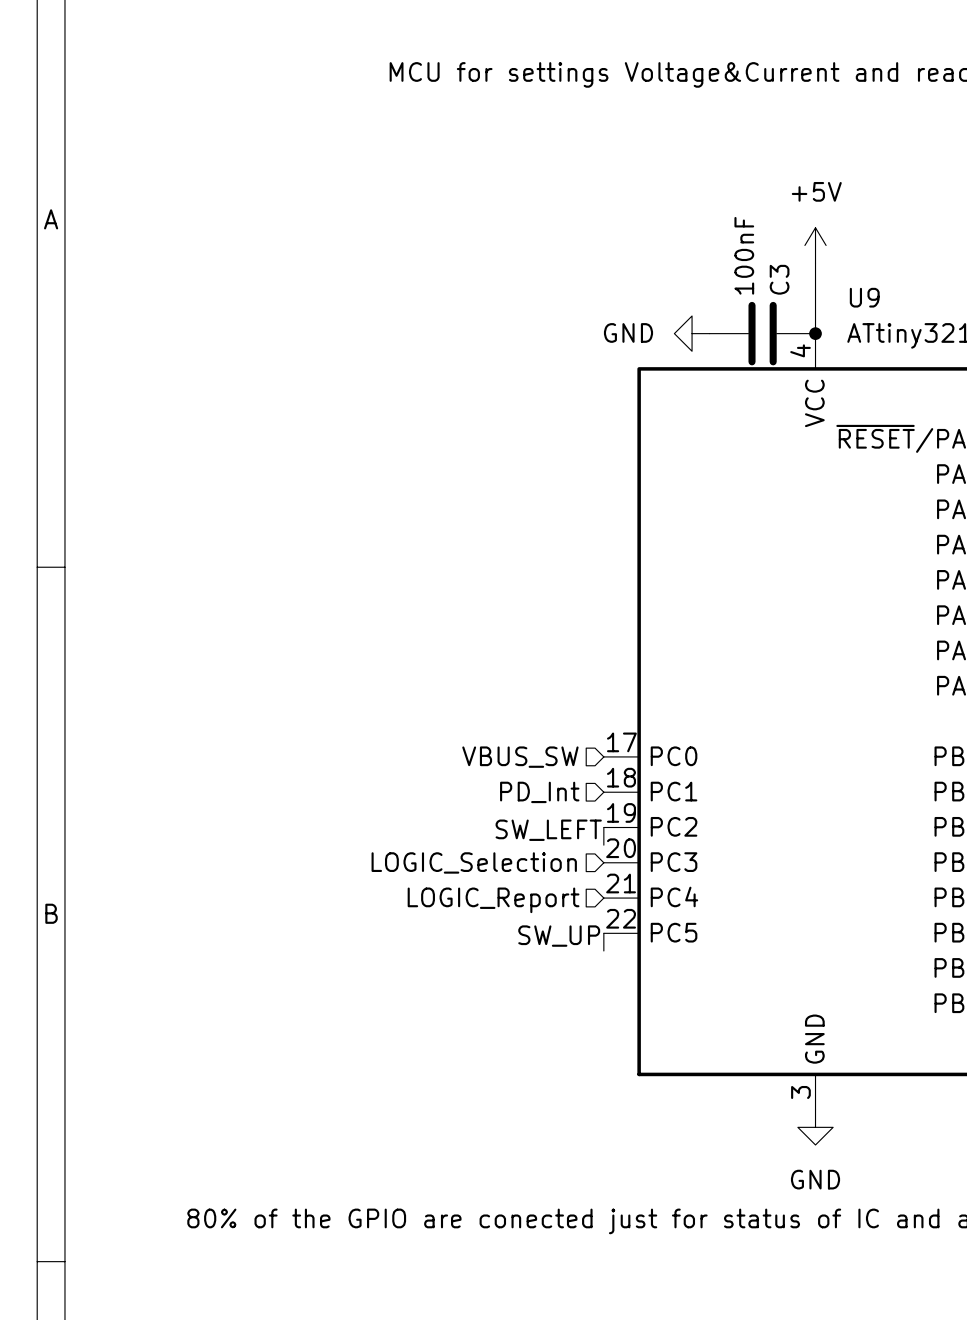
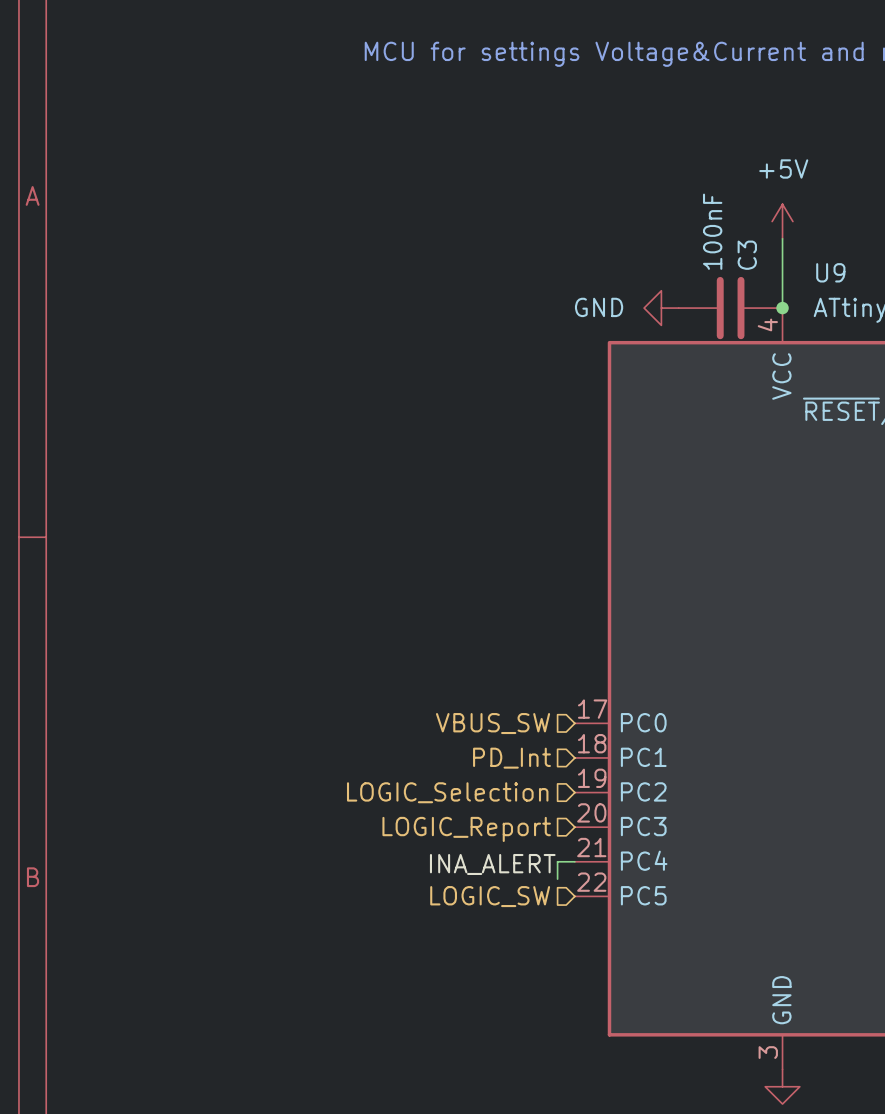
hierarchical label: none -> LOGIC_Selection (447, 792)
wire: (603, 827) (603, 845) -> none
label: SW_LEFT (548, 830) -> none
hierarchical label: LOGIC_Selection (474, 862) -> LOGIC_Report (466, 829)
wire: none -> (574, 861) (557, 861) (557, 879)
hierarchical label: LOGIC_Report (493, 900) -> none
label: none -> INA_ALERT (492, 864)
hierarchical label: none -> LOGIC_SW (490, 896)
wire: (603, 933) (603, 950) -> none
label: SW_UP (559, 936) -> none

